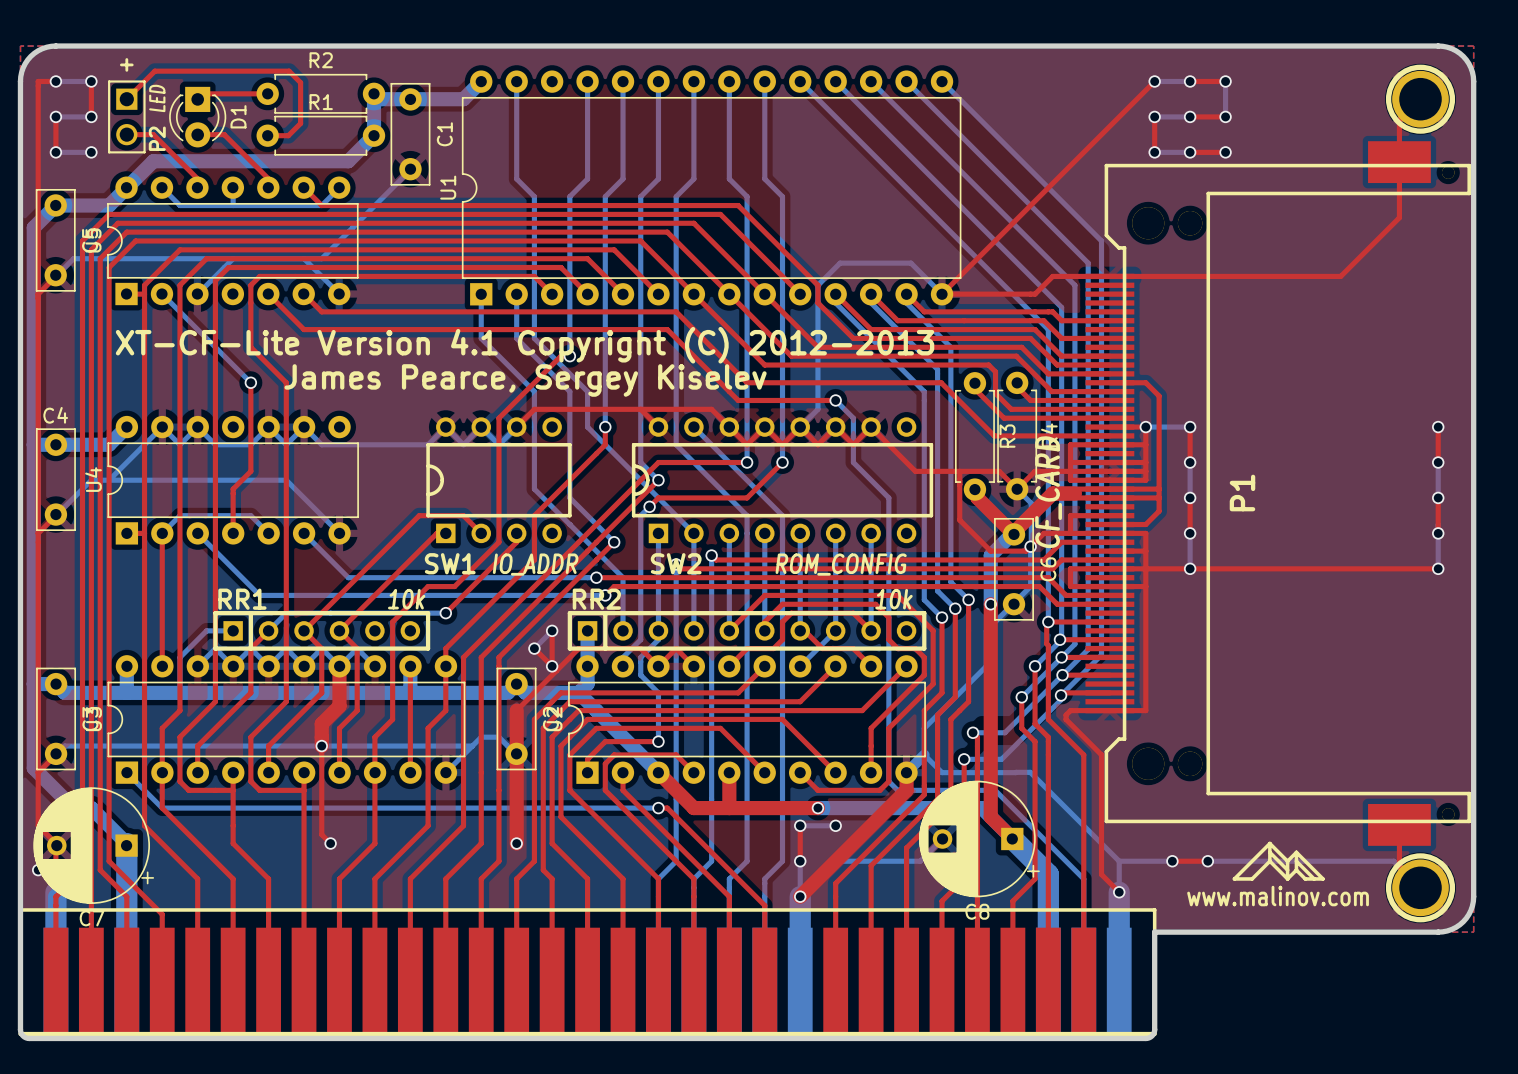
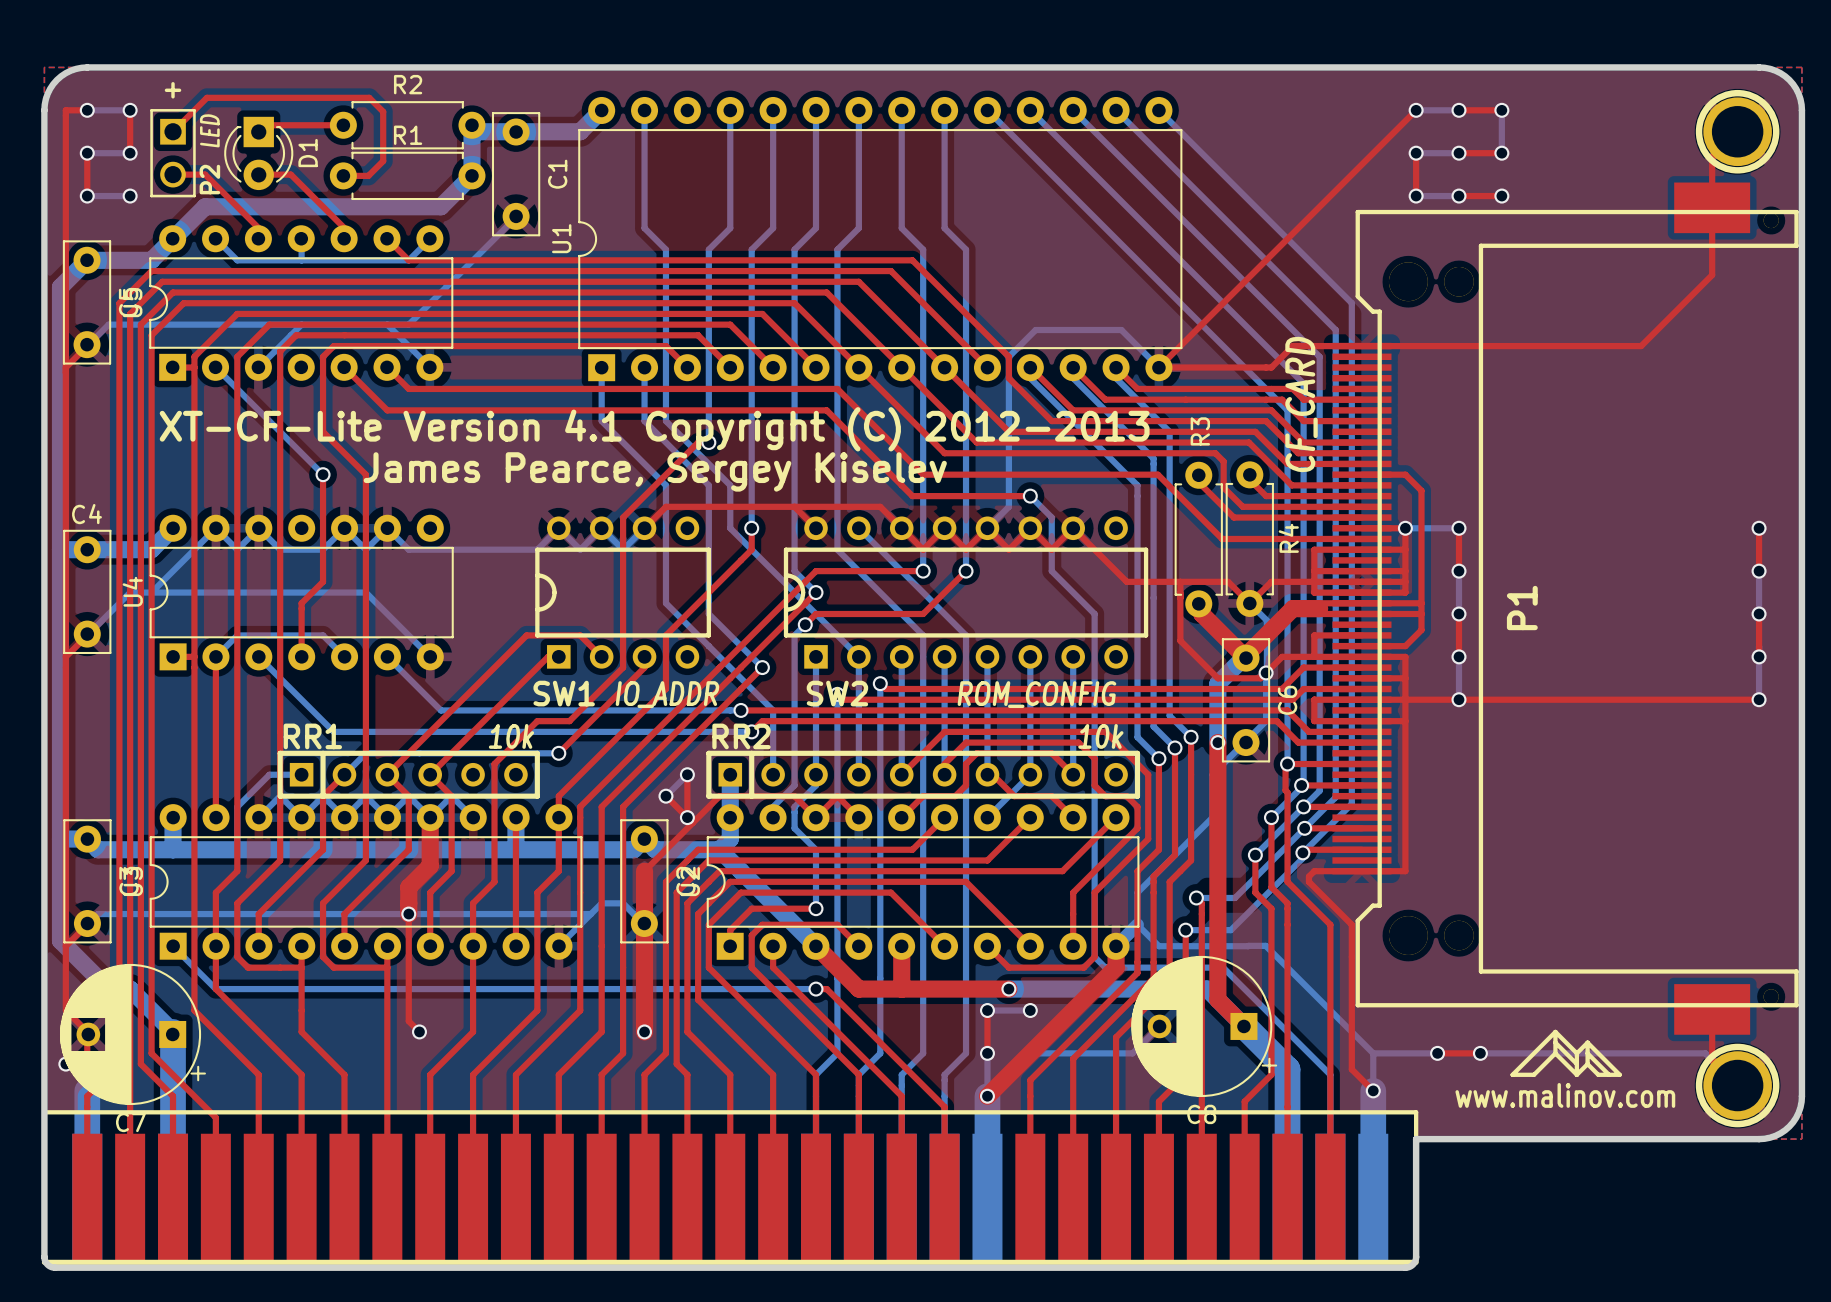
R3 name position: R3 (1007, 436) -> R3 (1200, 431)
P1 value position: CF_CARD (1048, 492) -> CF_CARD (1301, 404)

